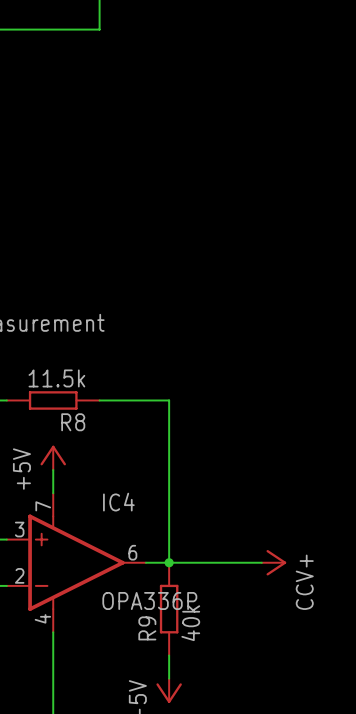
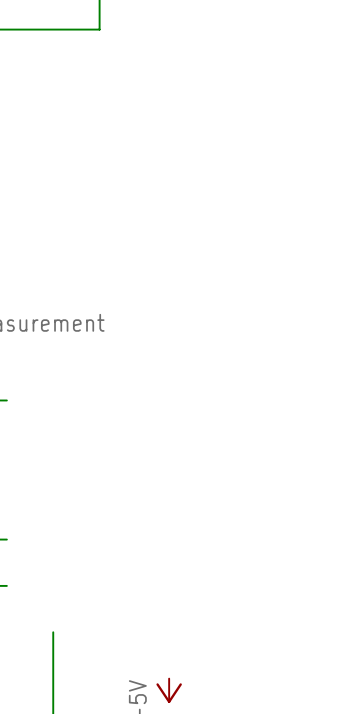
R8: 11.5k (53, 400) -> none
wire: (99, 400) (169, 400) (169, 562) -> none
power symbol: +5V (53, 457) -> none
wire: (53, 470) (53, 493) -> none
IC4: OPA336P (76, 562) -> none
wire: (145, 562) (261, 562) -> none
junction: (169, 562) -> none
power symbol: CCV+ (274, 562) -> none
R9: 40k (169, 609) -> none
wire: (169, 655) (169, 678) -> none

